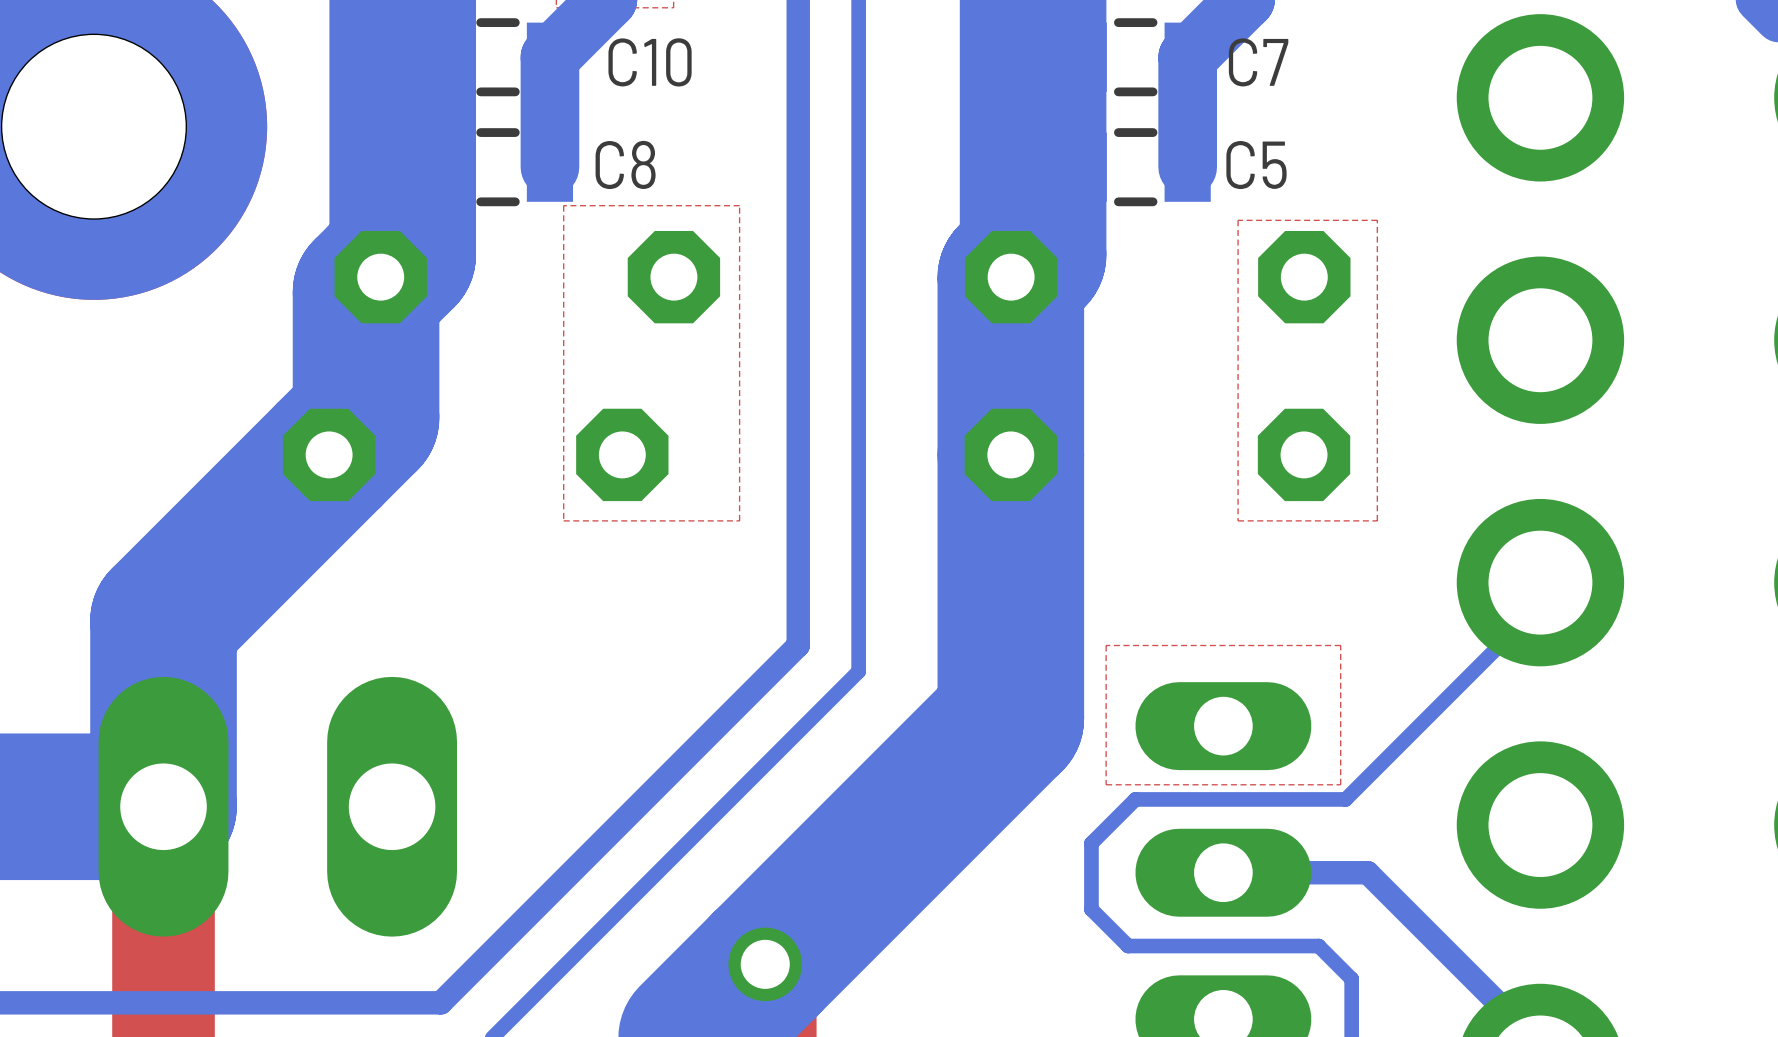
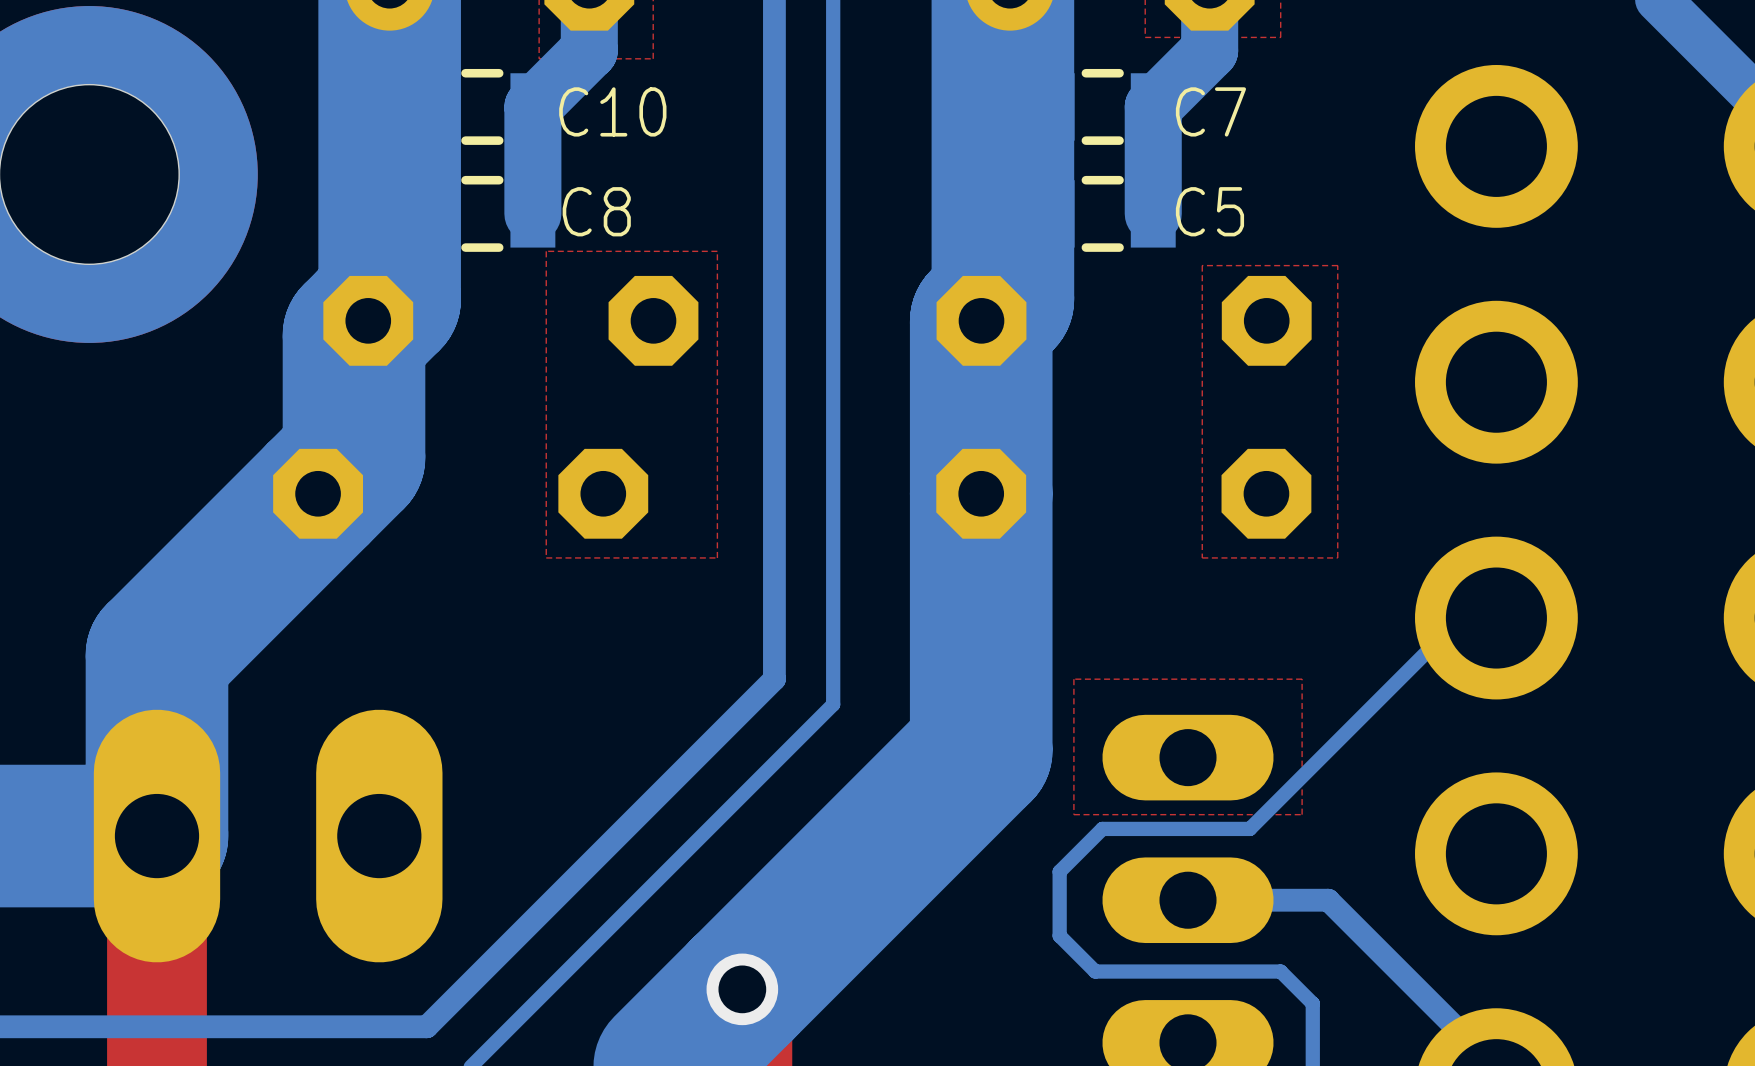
bottom track: (1540, 582) (1540, 604) (1345, 799) (1287, 799) -> (1496, 618) (1460, 618) (1249, 828)

